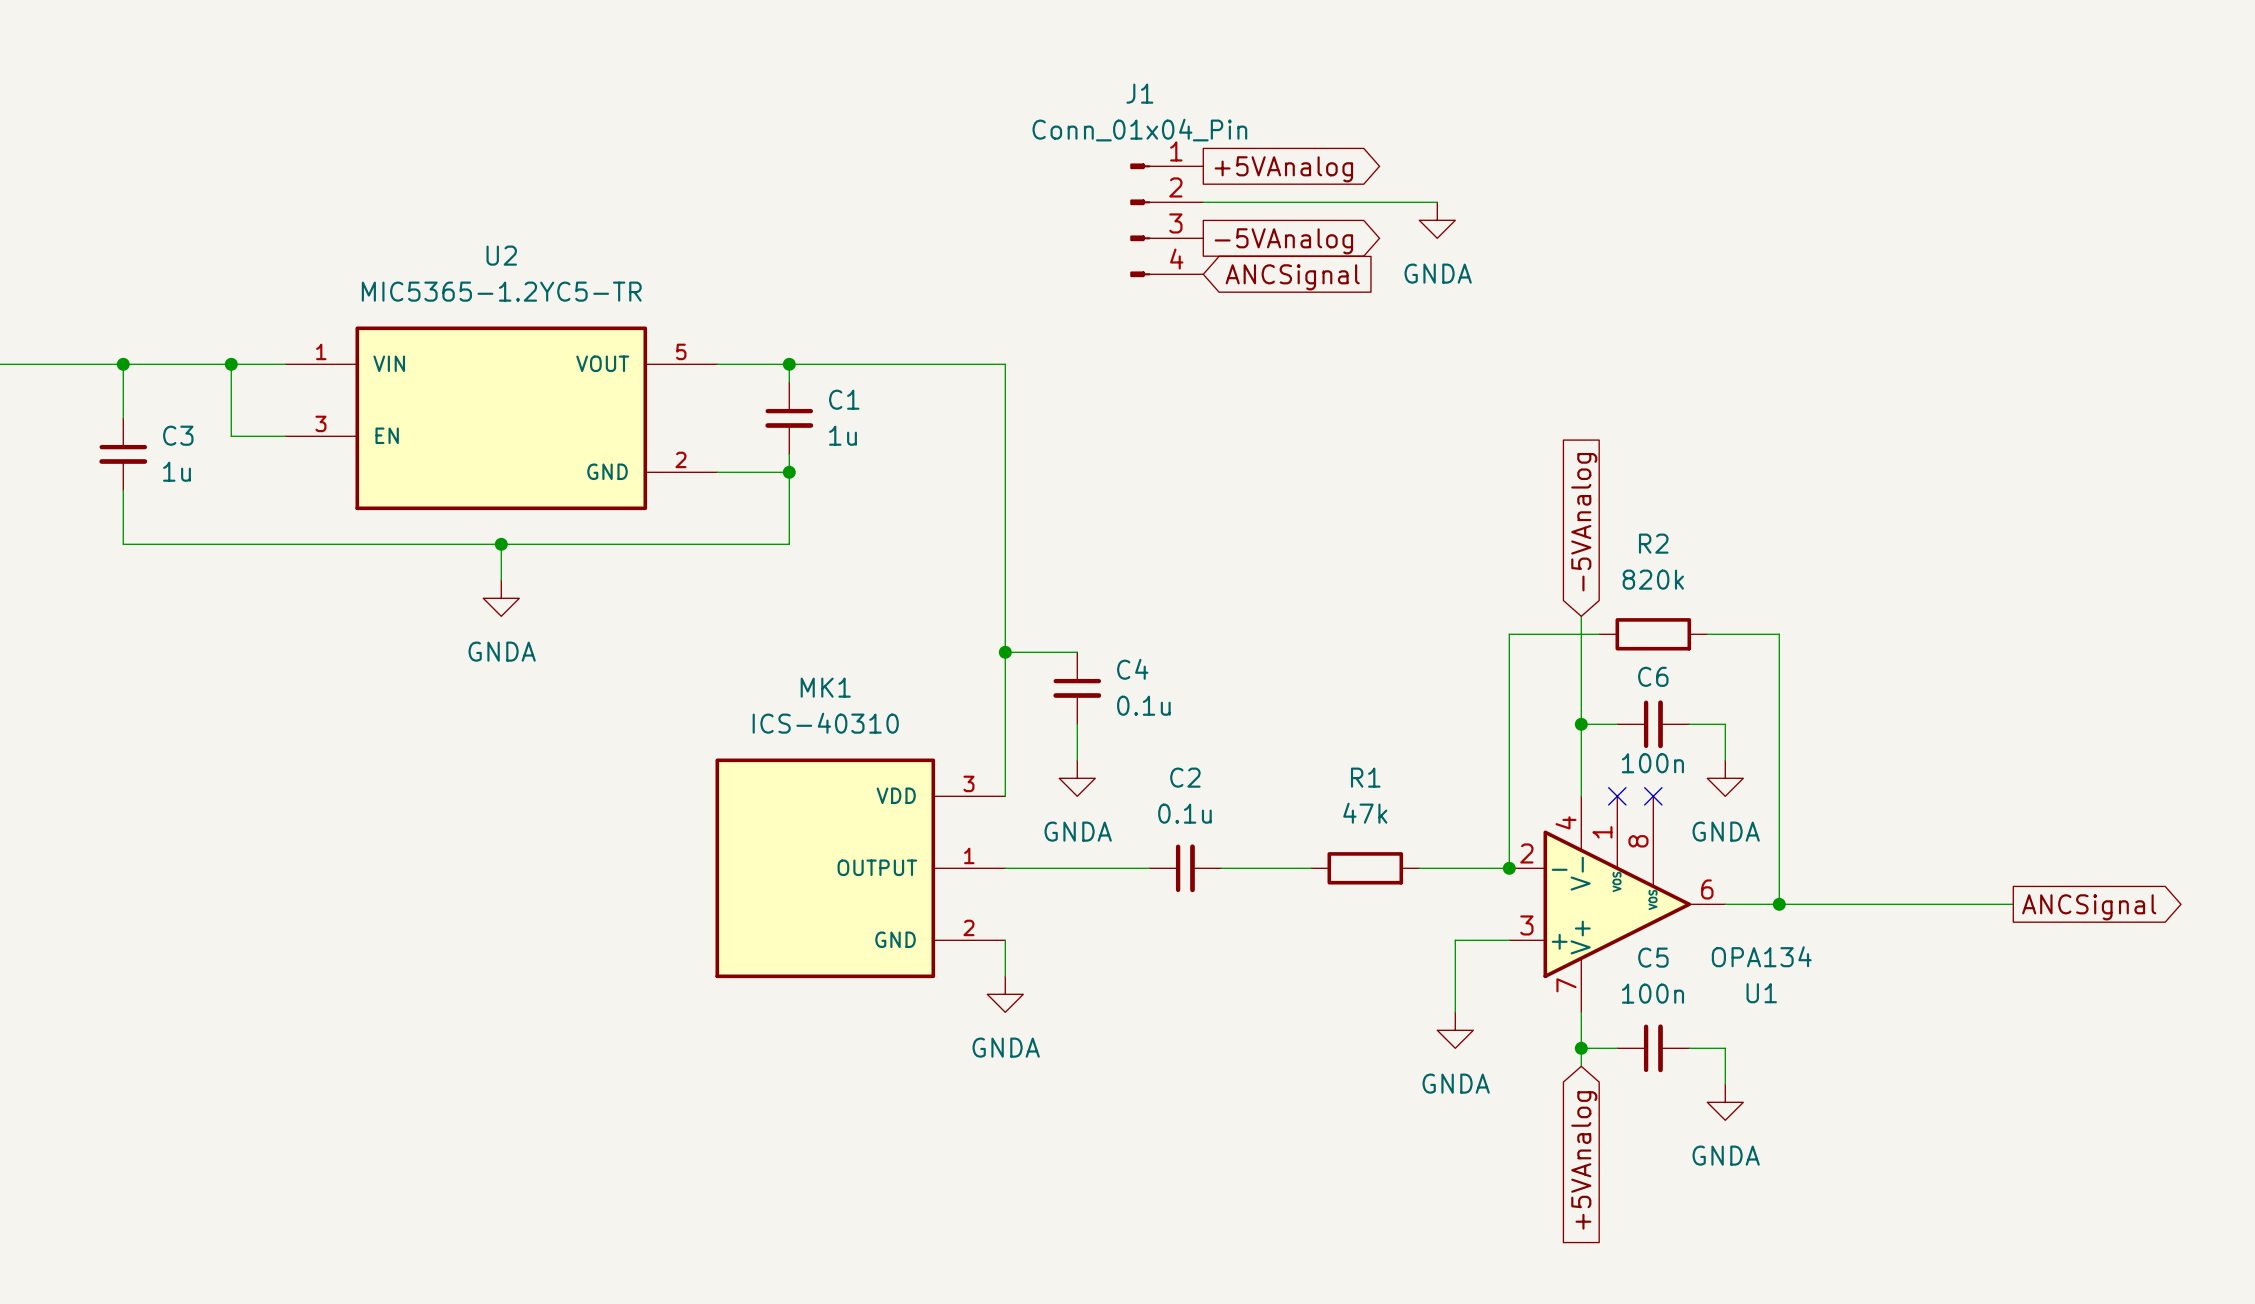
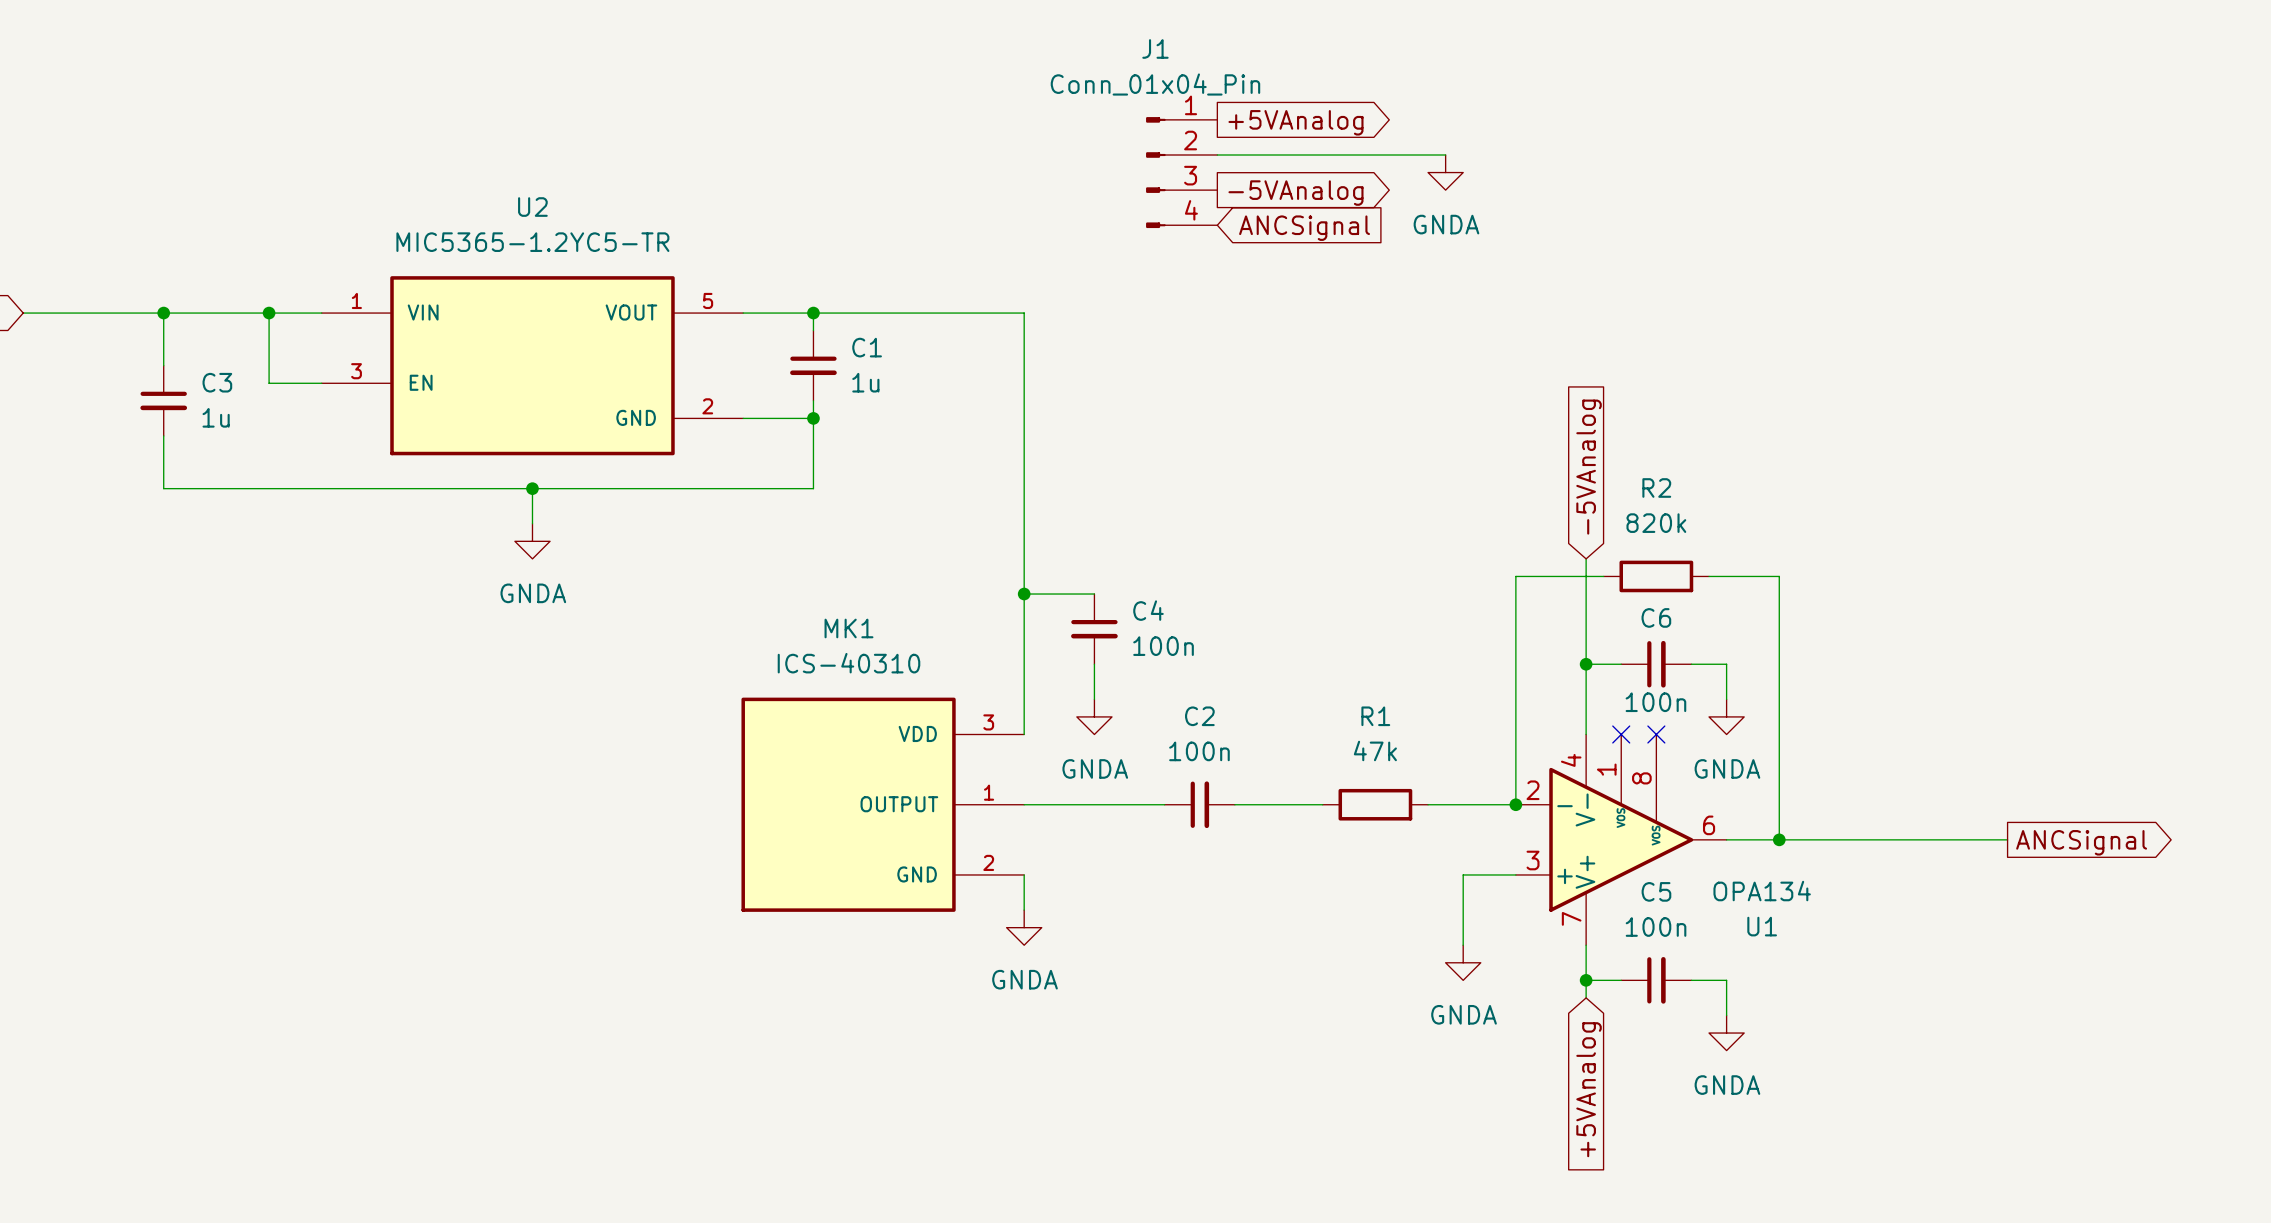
C4 value: 0.1u (1143, 705) -> 100n (1163, 646)
C2 value: 0.1u (1184, 813) -> 100n (1199, 751)

